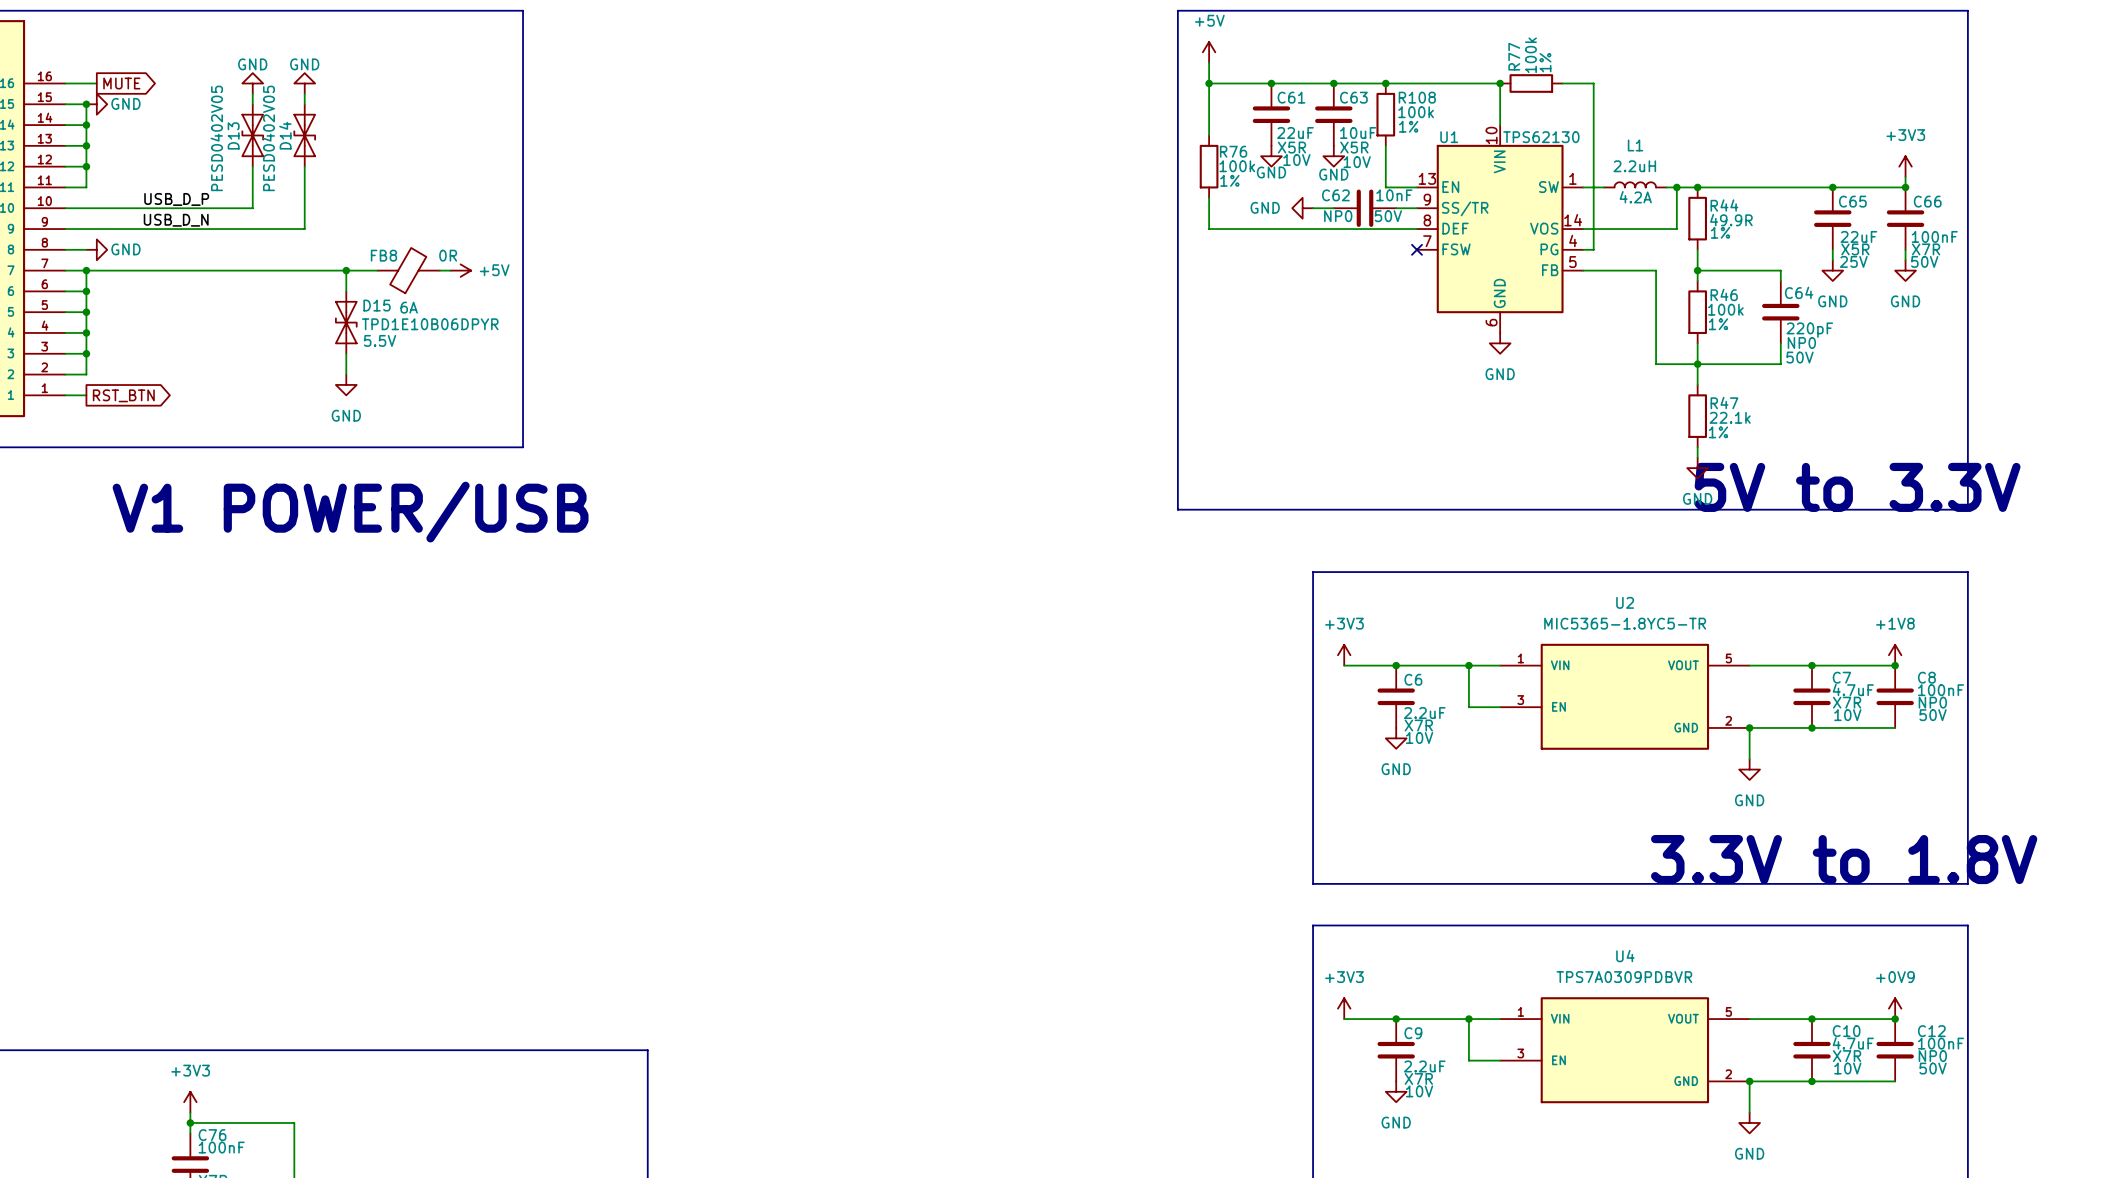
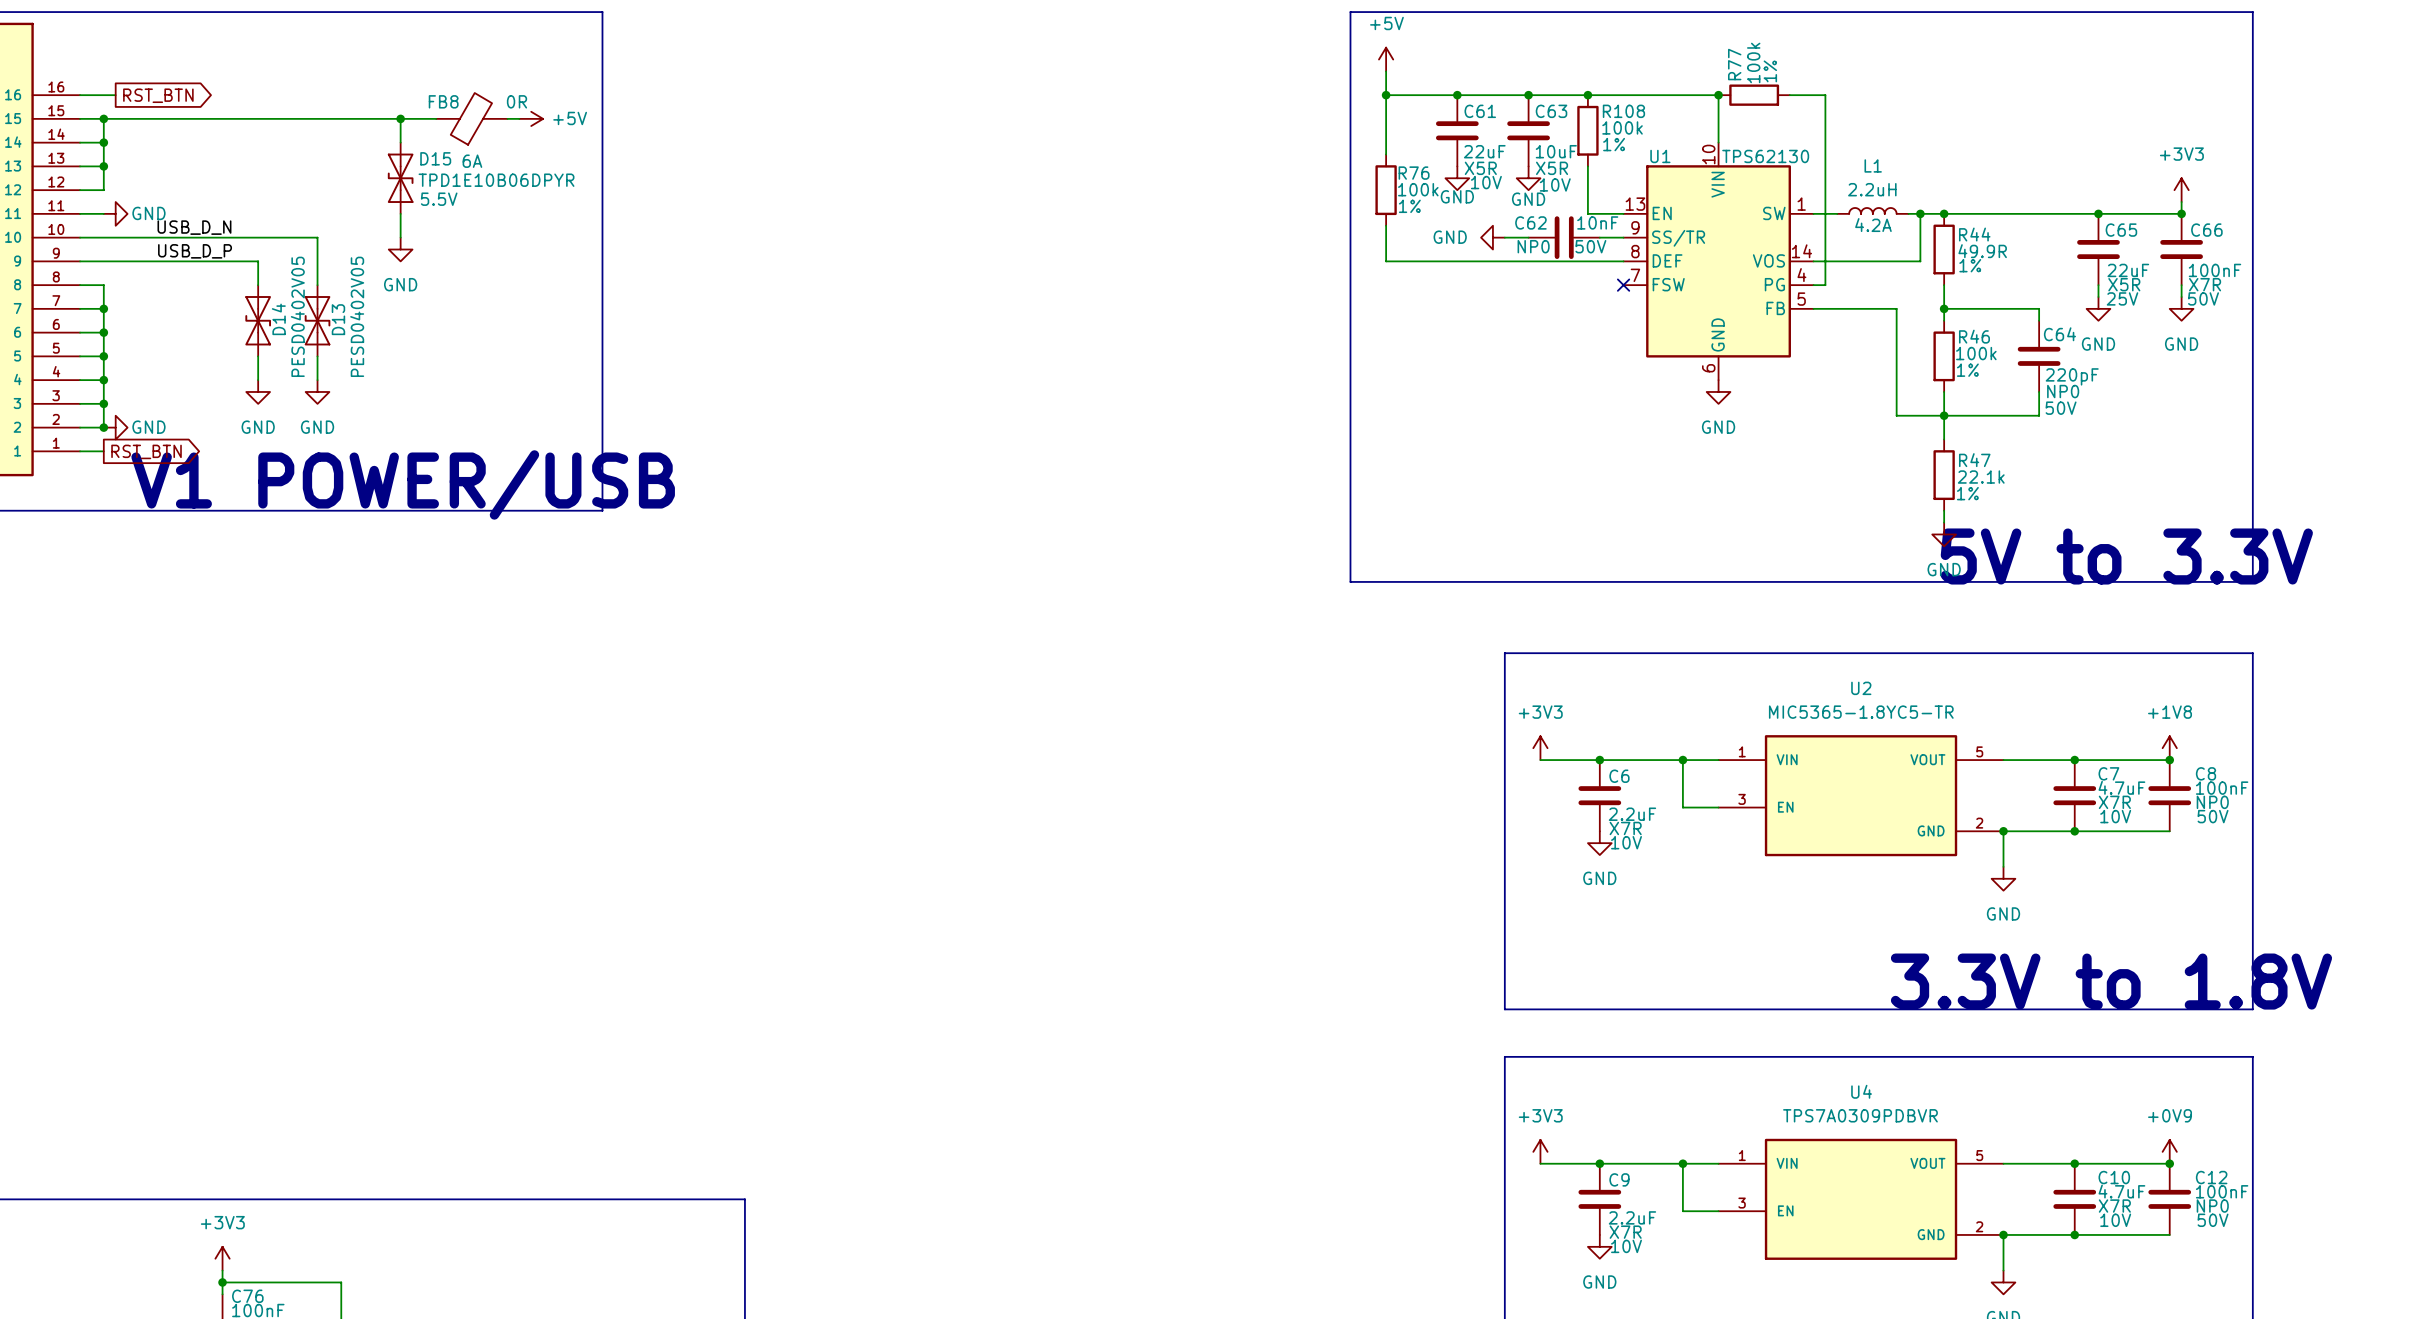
global label: MUTE (121, 83) -> RST_BTN (158, 95)
power symbol: GND (252, 83) -> none
power symbol: GND (304, 83) -> none
wire: (252, 93) (252, 104) -> none
wire: (304, 93) (304, 104) -> none
wire: none -> (103, 118) (436, 118)
power symbol: GND (96, 104) -> none
junction: none -> (400, 118)
D13 name position: D13 (233, 135) -> D13 (338, 319)
D13 position: (252, 135) -> (317, 320)
D14 name position: D14 (285, 135) -> D14 (278, 319)
D14 position: (304, 135) -> (258, 320)
D13 value position: PESD0402V05 (216, 138) -> PESD0402V05 (357, 316)
D14 value position: PESD0402V05 (268, 138) -> PESD0402V05 (297, 316)
wire: (86, 166) (86, 187) -> (258, 356) (258, 380)
junction: (86, 166) -> none
wire: (252, 166) (252, 208) -> (317, 285) (317, 237) (293, 237)
wire: (304, 166) (304, 229) (221, 229) -> (258, 285) (258, 261)
power symbol: none -> GND (115, 213)
label position: USB_D_P (176, 199) -> USB_D_P (195, 251)
power symbol: none -> GND (400, 249)
label position: USB_D_N (176, 220) -> USB_D_N (194, 227)
power symbol: GND (96, 249) -> none
wire: (86, 270) (377, 270) -> (103, 308) (103, 285)
wire: (346, 270) (346, 291) -> (400, 118) (400, 142)
junction: (346, 270) -> none
FB8 position: (408, 270) -> (471, 118)
wire: (439, 270) (450, 270) -> (507, 118) (519, 118)
power symbol position: +5V (460, 270) -> +5V (531, 118)
wire: none -> (317, 356) (317, 380)
D15 position: (346, 322) -> (400, 178)
power symbol: none -> GND (258, 391)
power symbol: none -> GND (317, 391)
wire: (346, 353) (346, 374) -> (400, 213) (400, 237)
junction: none -> (103, 427)
power symbol: none -> GND (115, 427)
power symbol: GND (346, 384) -> none
text position: V1 POWER/USB (350, 512) -> V1 POWER/USB (403, 484)

